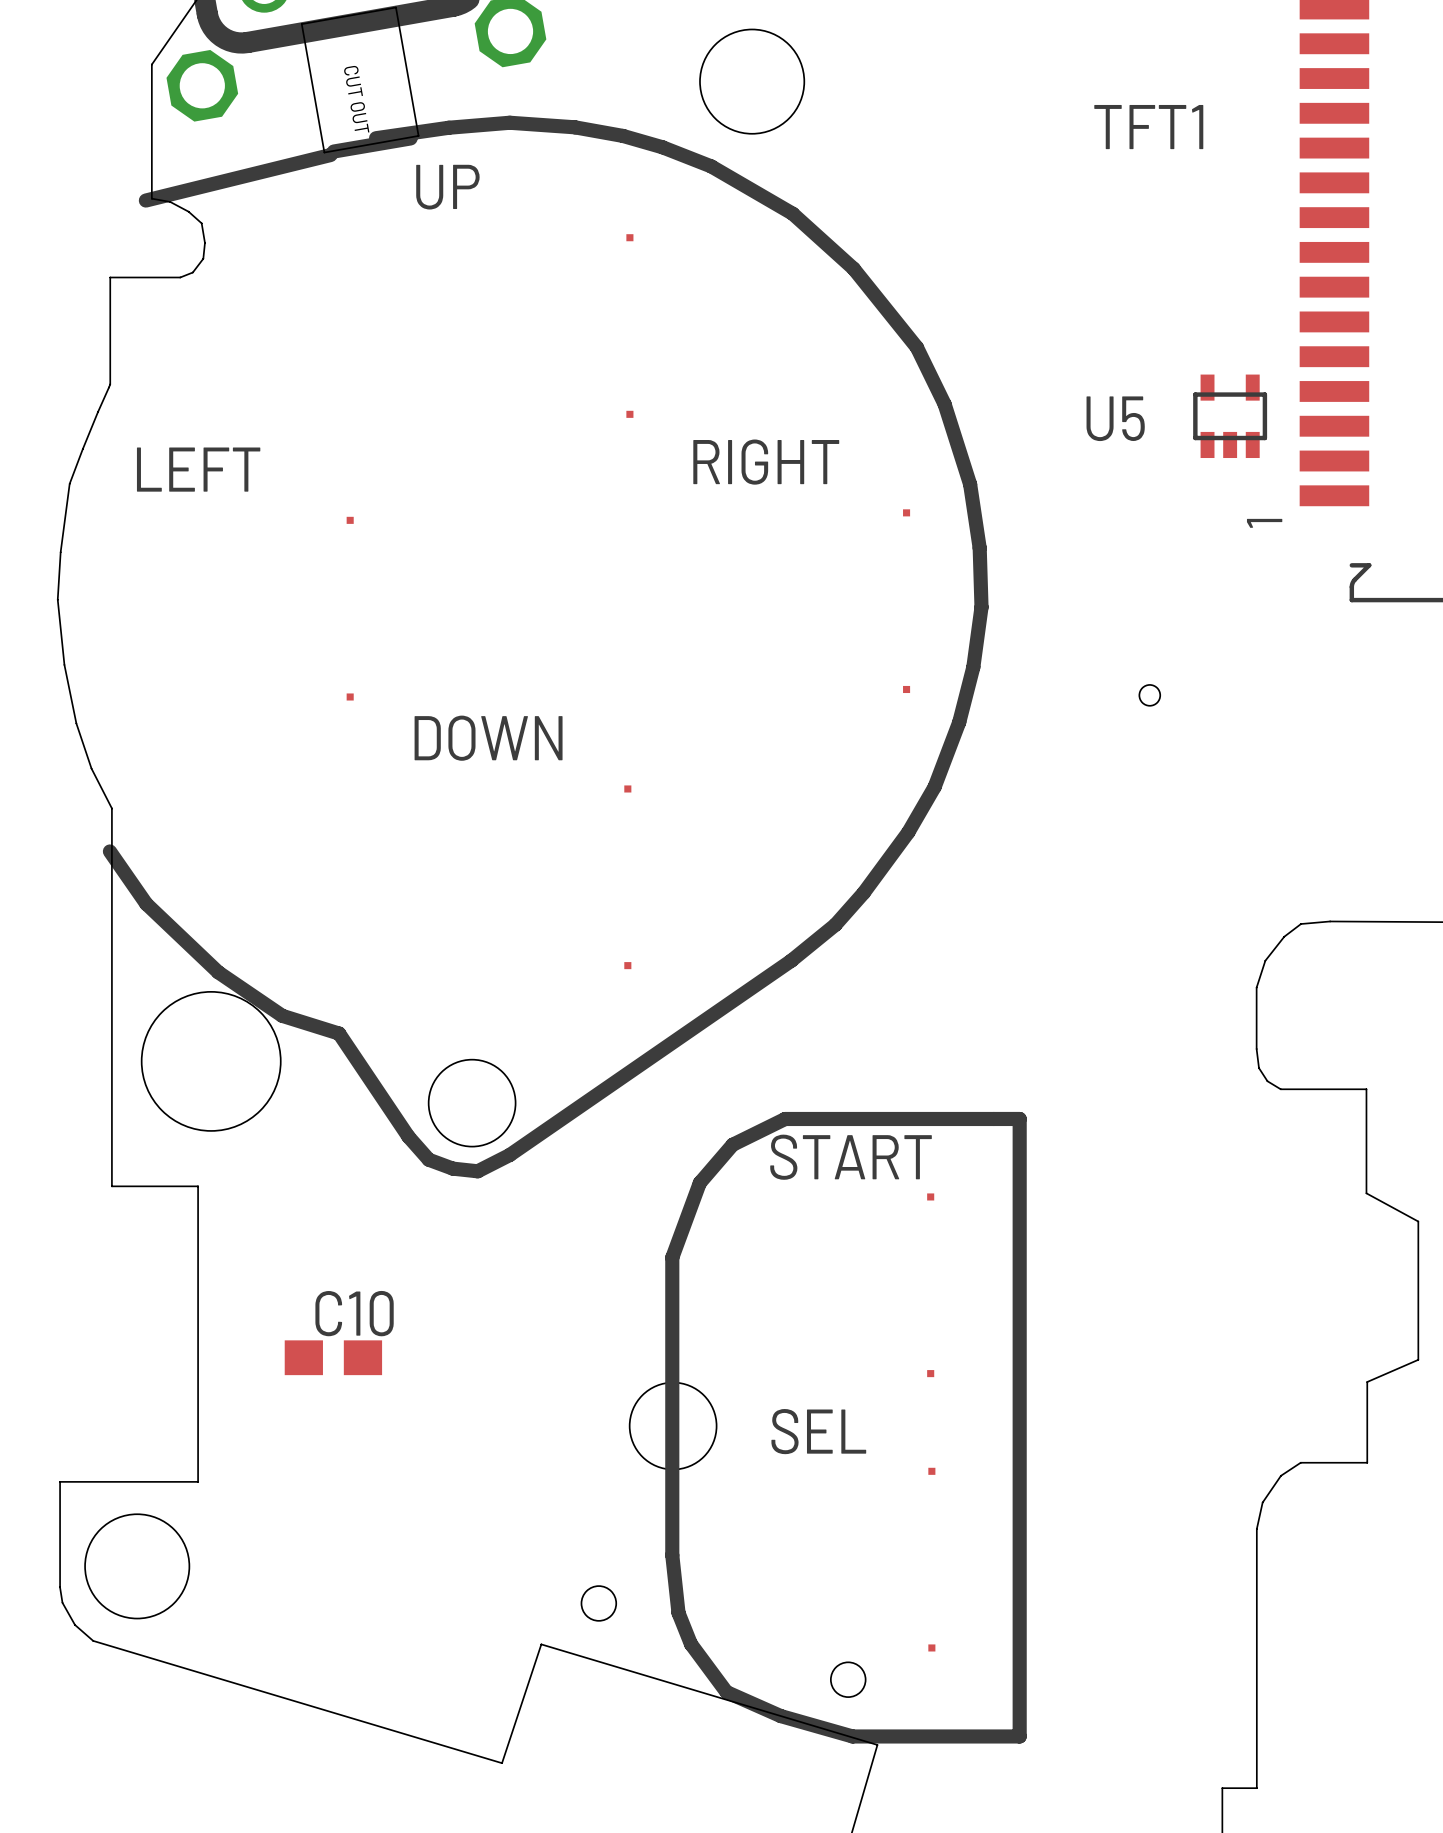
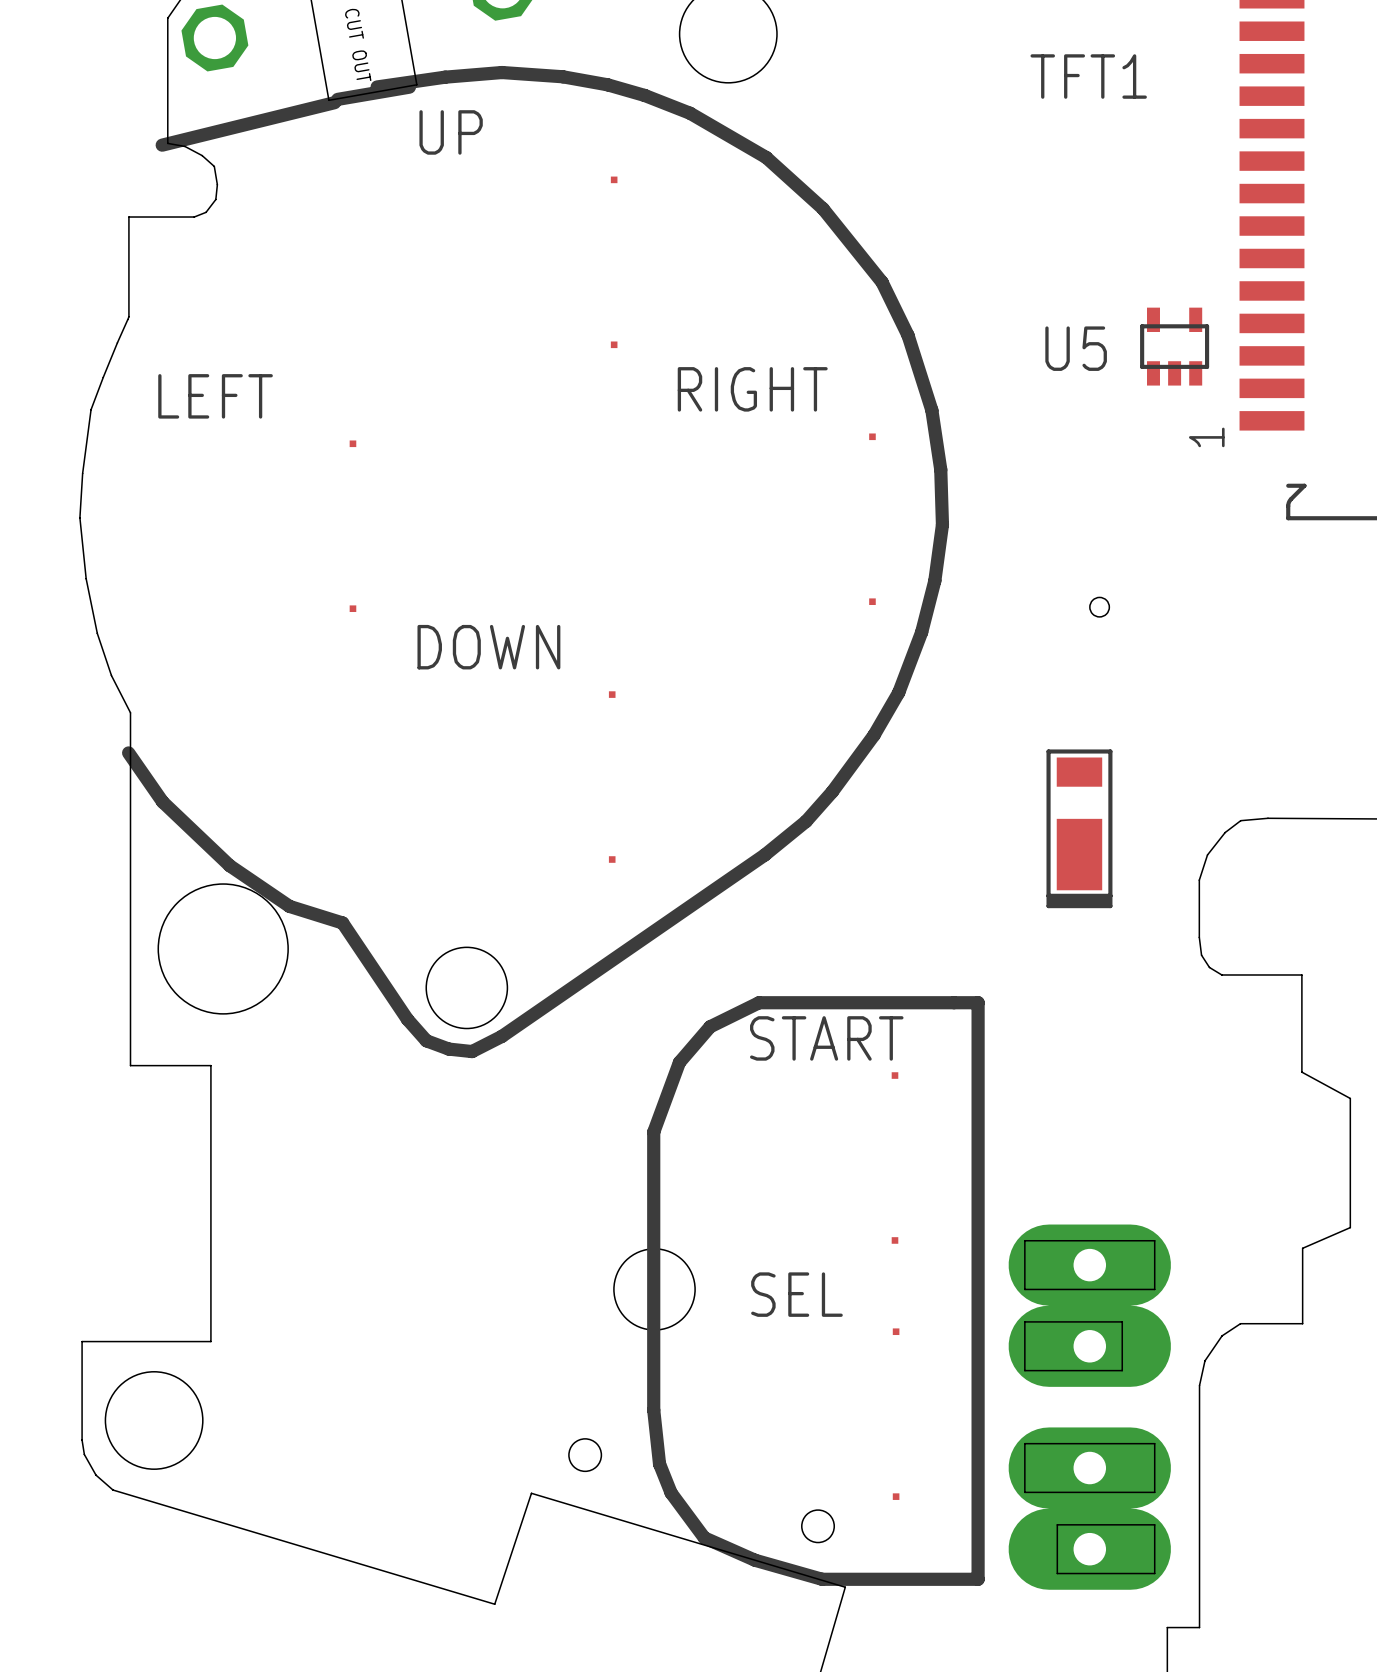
part: none -> (1079, 828)
C10: (333, 1357) -> none
part: none -> (1089, 1407)

